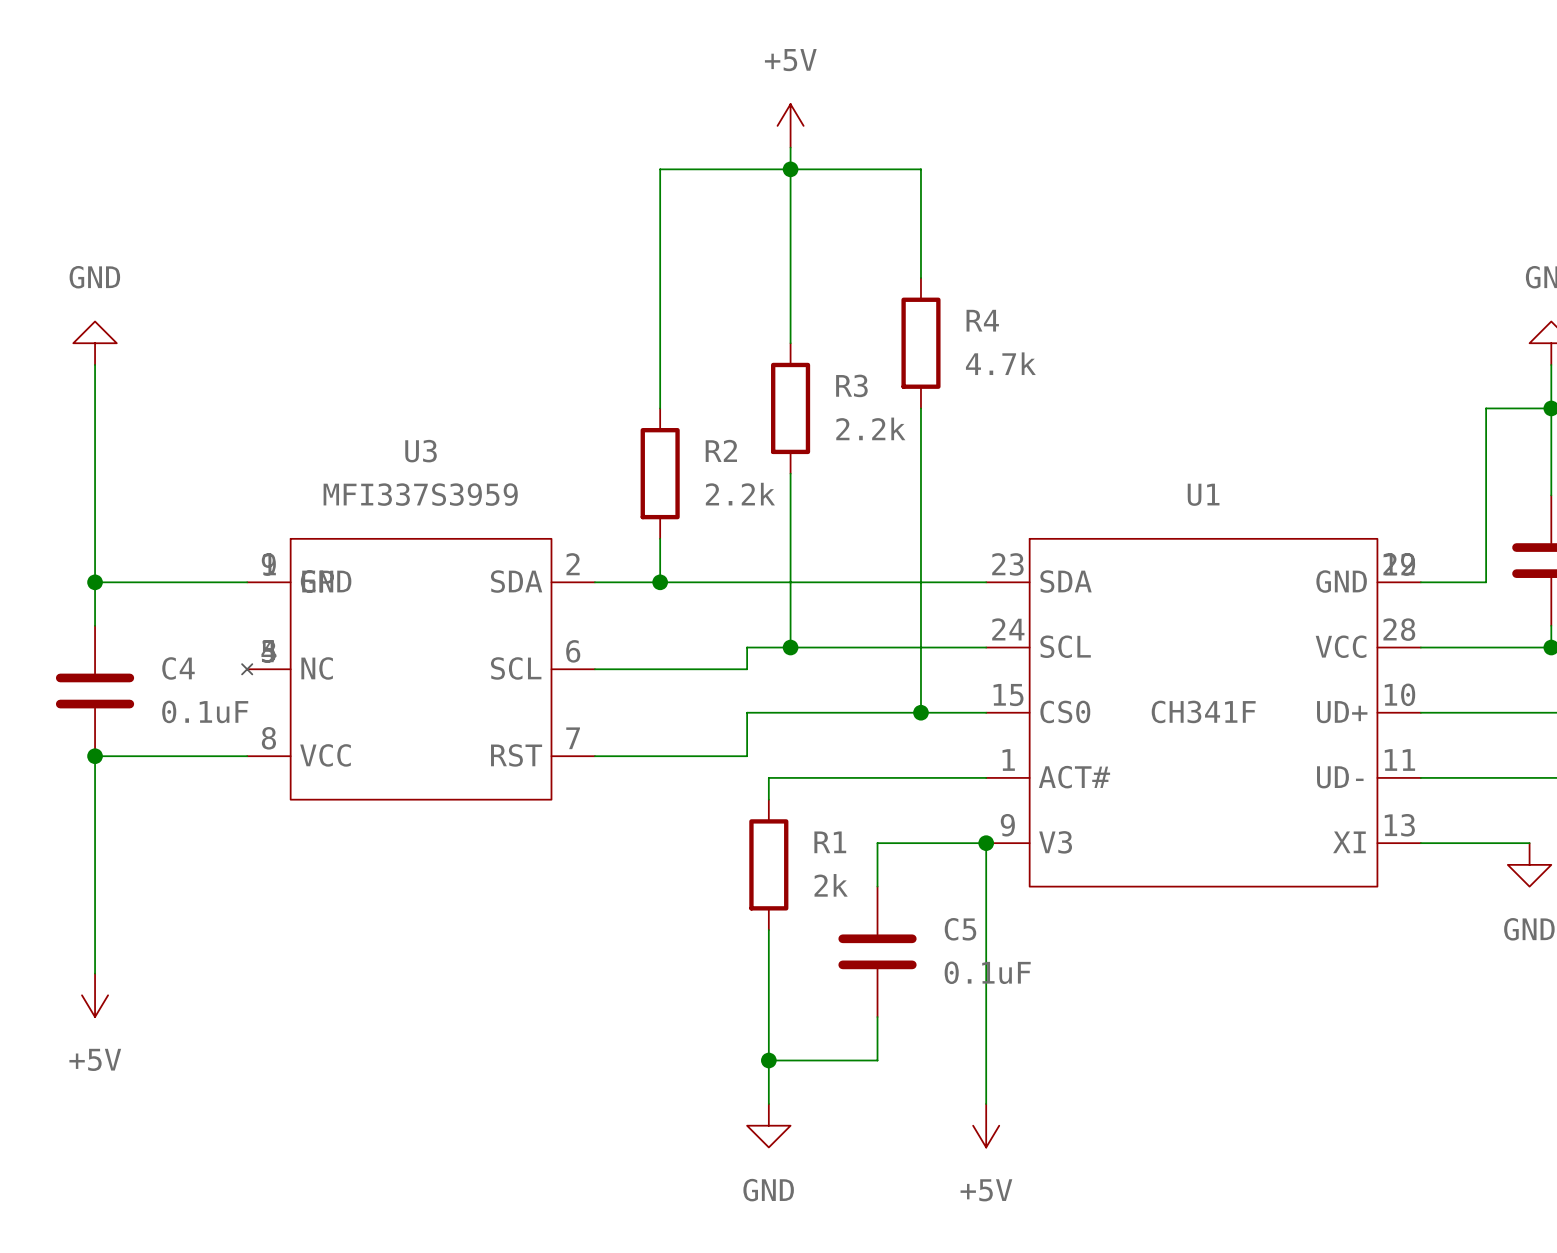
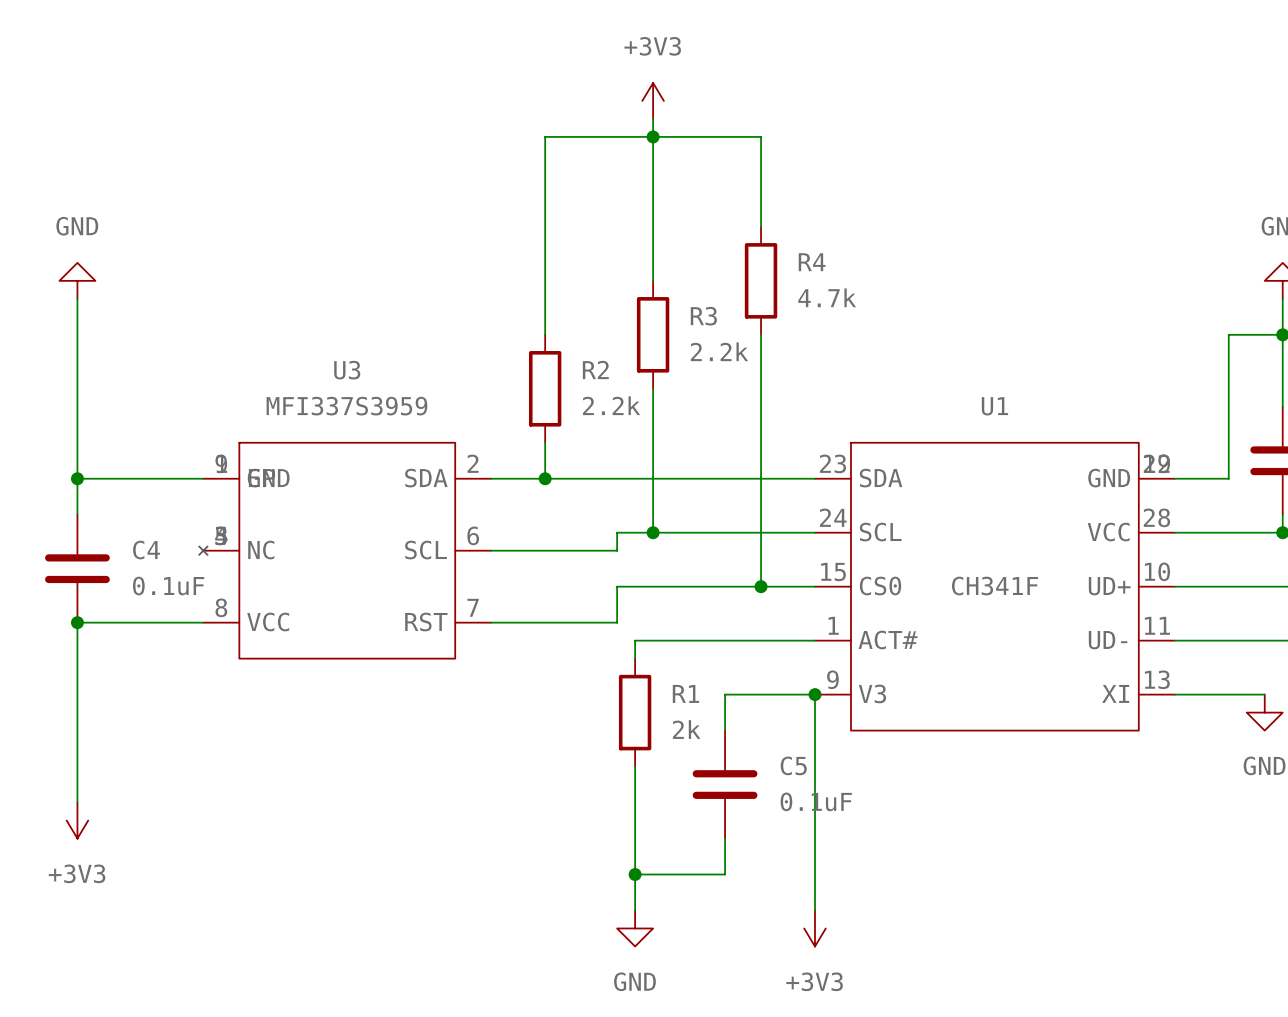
power symbol: +5V (790, 125) -> +3V3 (653, 100)
power symbol: +5V (95, 995) -> +3V3 (77, 820)
power symbol: +5V (986, 1125) -> +3V3 (815, 928)

